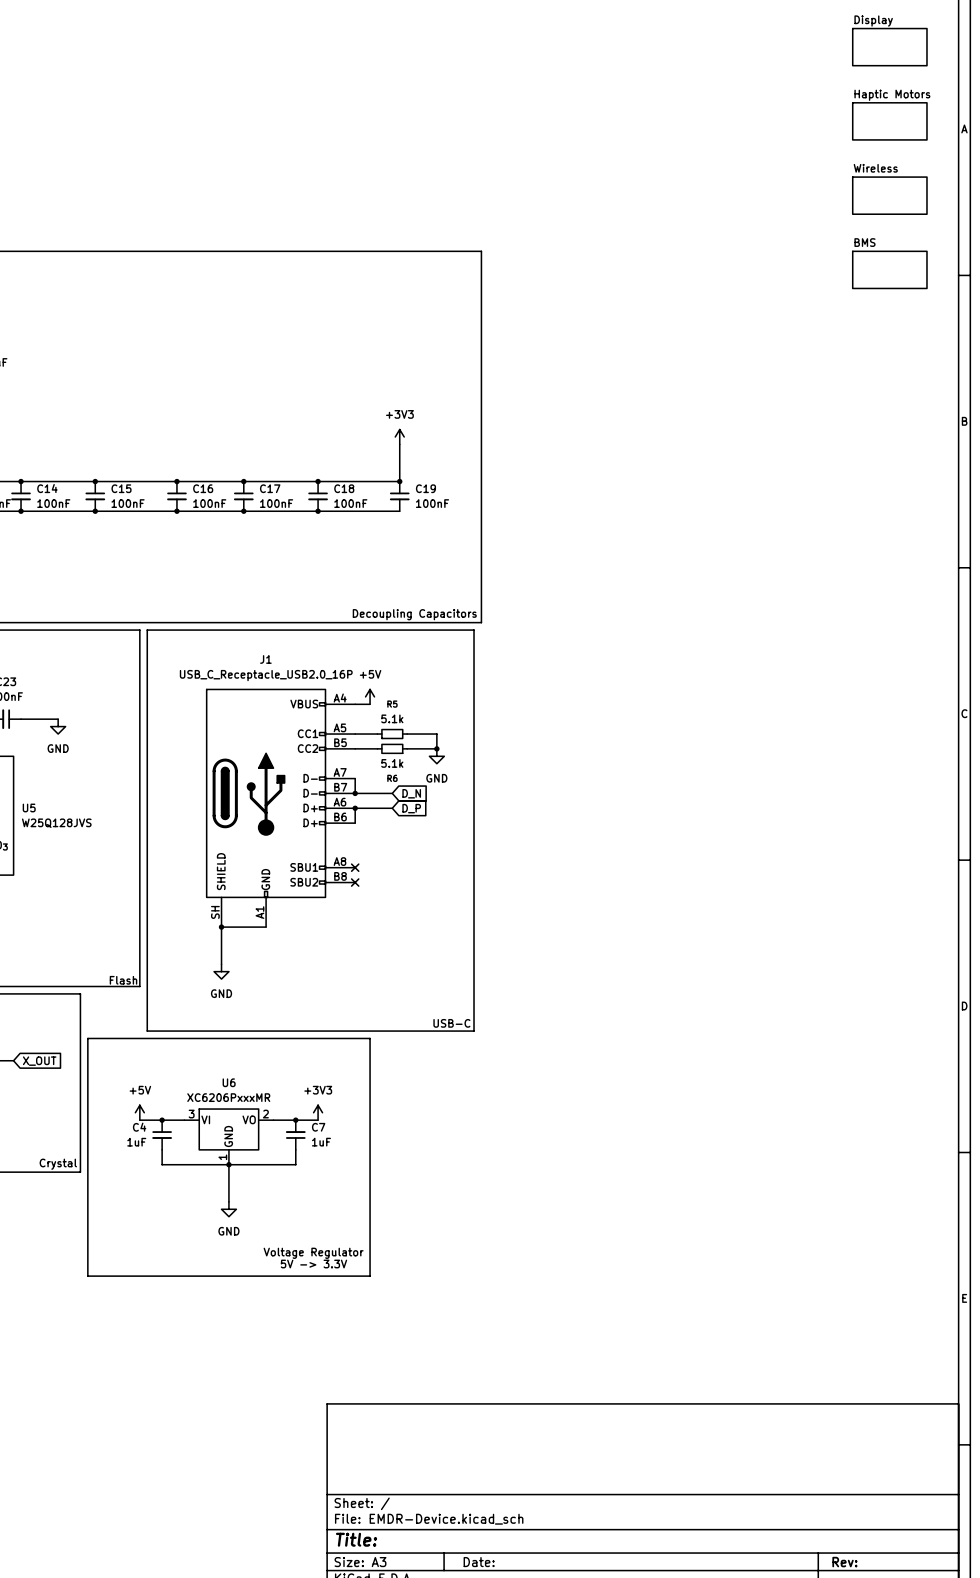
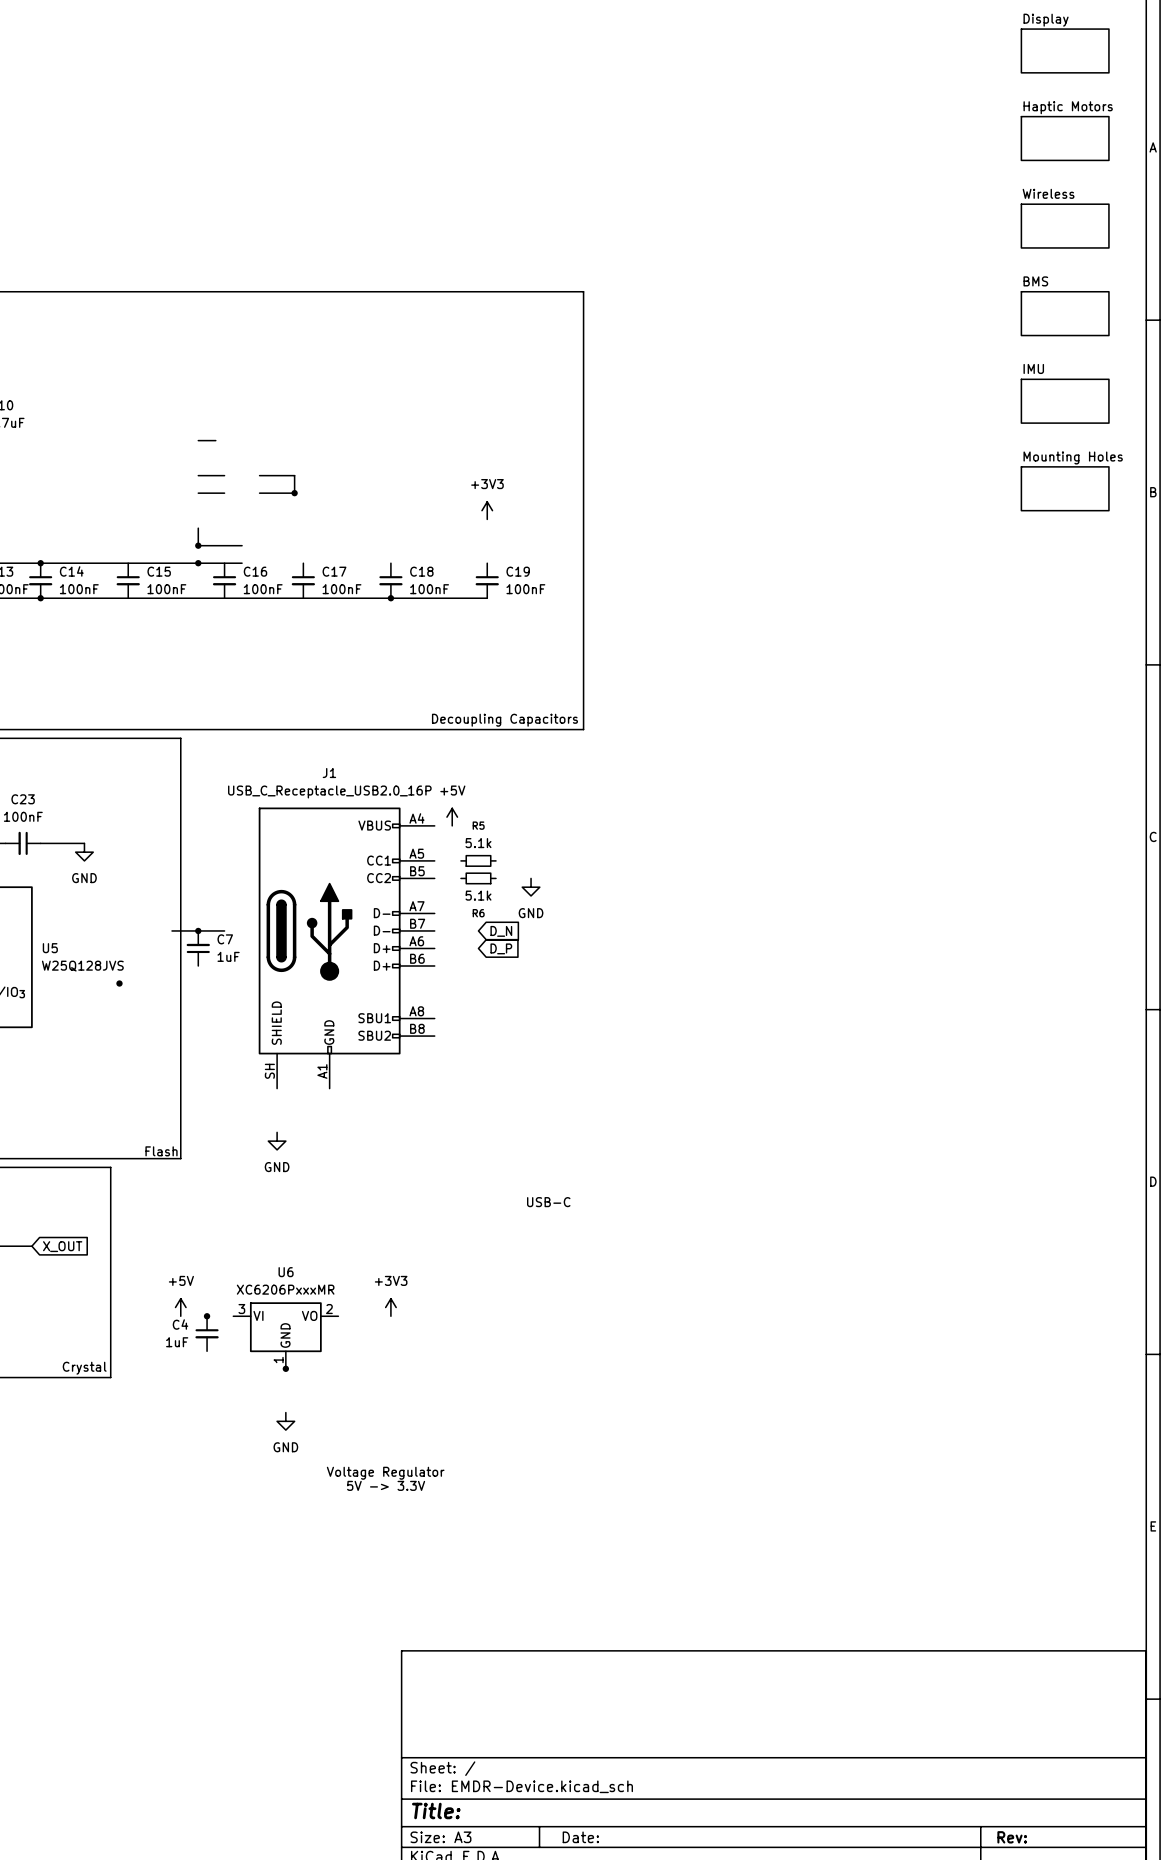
sheet IMU: none -> (1065, 401)
wire: none -> (198, 440) (215, 440)
wire: none -> (198, 475) (224, 475)
wire: none -> (259, 475) (294, 475) (294, 493) (259, 493)
sheet Mounting Holes: none -> (1065, 488)
wire: none -> (198, 493) (224, 493)
junction: none -> (294, 493)
wire: (399, 444) (399, 481) (191, 481) -> none
wire: none -> (198, 528) (198, 545) (242, 545)
junction: none -> (198, 545)
junction: (95, 481) -> none
junction: none -> (198, 563)
junction: (176, 481) -> none
junction: (243, 481) -> none
junction: (318, 481) -> none
junction: (399, 481) -> none
junction: (95, 511) -> none
junction: (176, 511) -> none
junction: (243, 511) -> none
line: (147, 630) (474, 630) (474, 1031) (147, 1031) (147, 630) -> none
wire: (355, 704) (370, 704) -> none
wire: (355, 734) (377, 734) -> none
wire: (407, 734) (436, 734) (436, 748) (407, 748) -> none
wire: (355, 748) (377, 748) -> none
junction: (436, 748) -> none
wire: (355, 778) (355, 793) (392, 793) -> none
wire: none -> (172, 930) (224, 930)
junction: none -> (198, 930)
junction: (355, 793) -> none
junction: (355, 808) -> none
wire: (392, 808) (355, 808) (355, 823) -> none
junction: none -> (119, 983)
no-connect mark: (355, 867) -> none
no-connect mark: (355, 882) -> none
junction: (221, 927) -> none
wire: (266, 927) (221, 927) (221, 964) -> none
line: (87, 1038) (370, 1038) (370, 1276) (87, 1276) (87, 1038) -> none
wire: (139, 1120) (184, 1120) -> none
wire: (273, 1120) (318, 1120) -> none
junction: (295, 1120) -> none
C7 position: (295, 1135) -> (198, 948)
wire: (162, 1149) (162, 1164) (295, 1164) (295, 1149) -> none
wire: (228, 1164) (228, 1201) -> none

